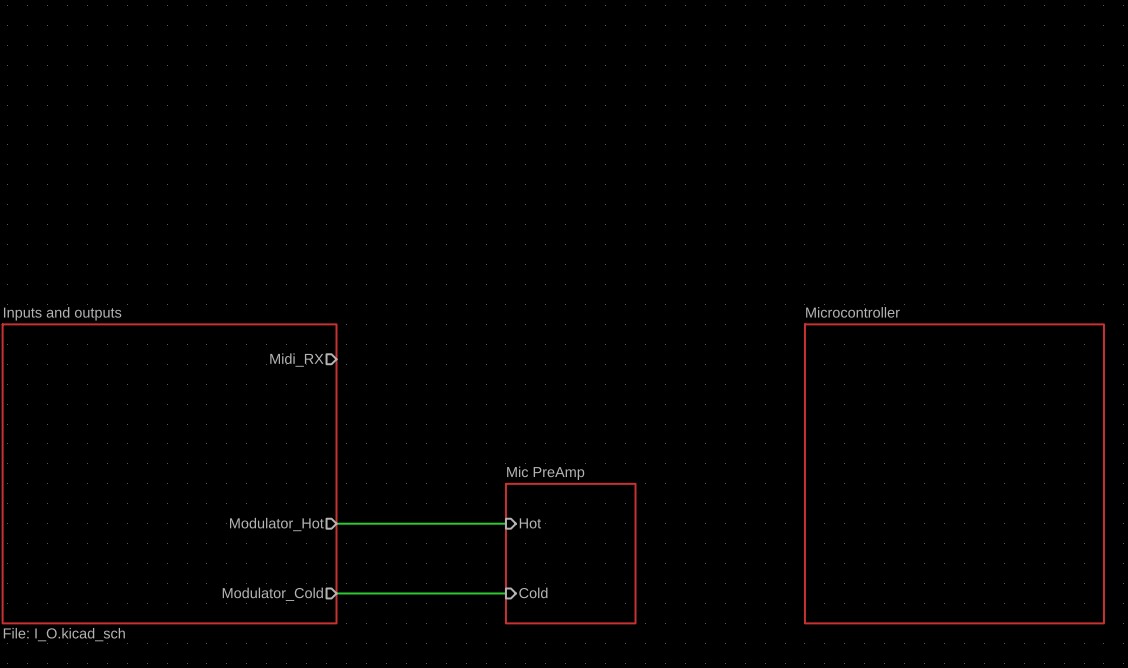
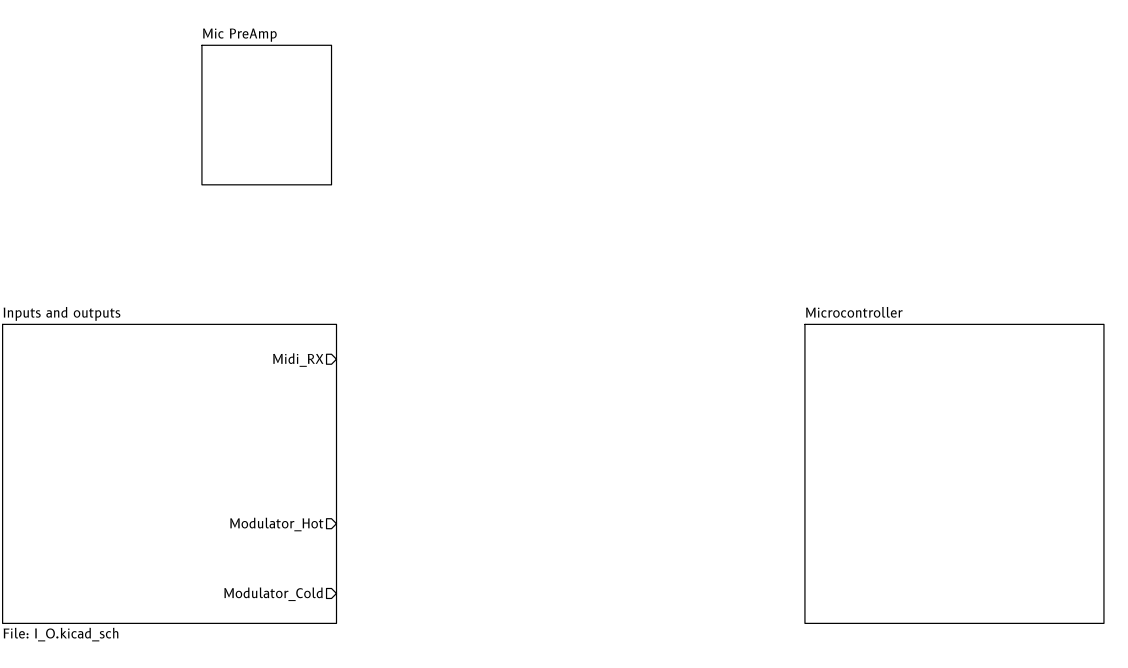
sheet Mic PreAmp: none -> (266, 115)
wire: (336, 523) (505, 523) -> none
sheet pin: Hot (530, 523) -> none
sheet Mic PreAmp: (570, 553) -> none
sheet pin: Cold (533, 592) -> none
wire: (336, 593) (505, 593) -> none

